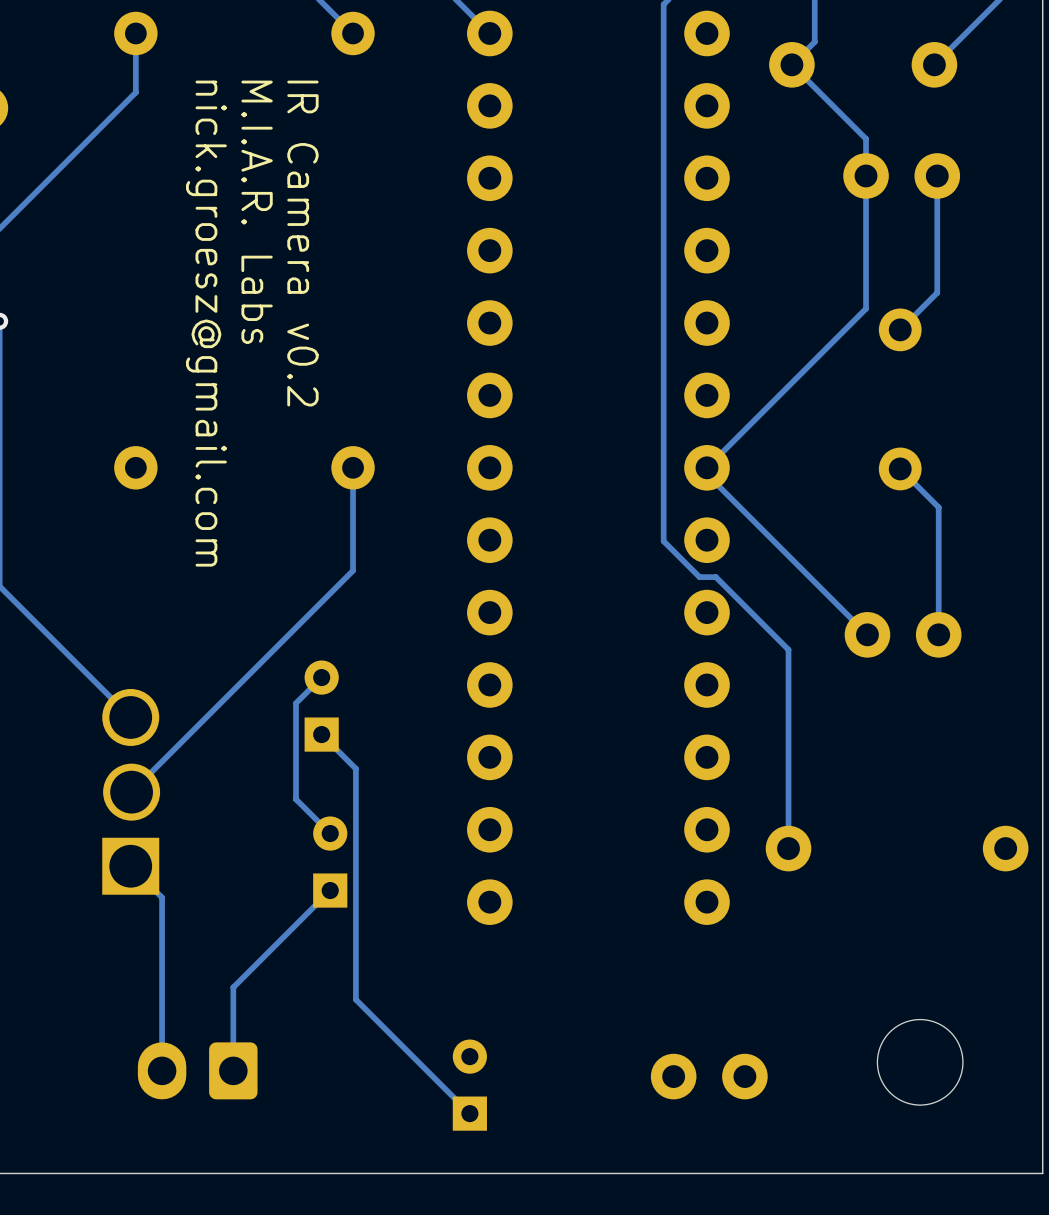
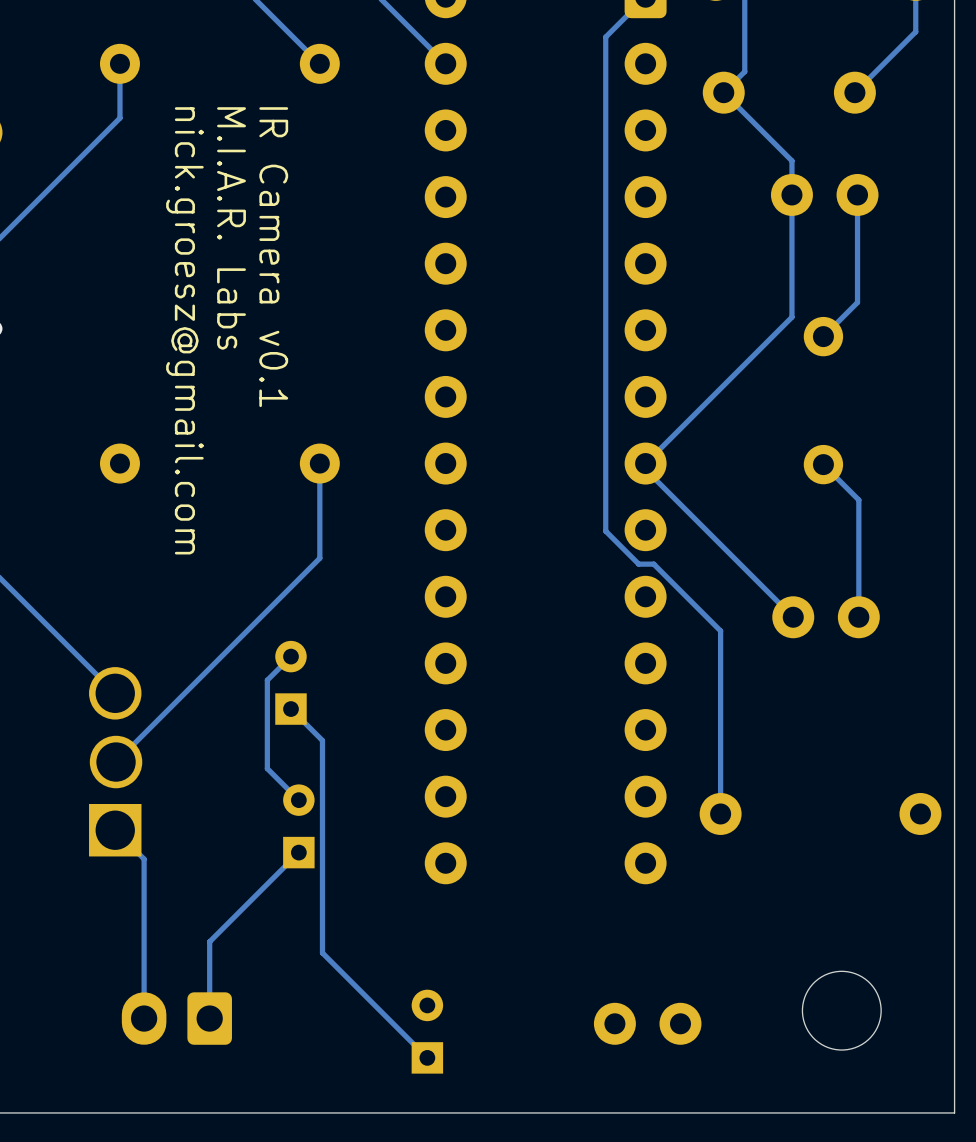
text: IR Camera v0.2 (302, 243) -> IR Camera v0.1 (273, 257)

